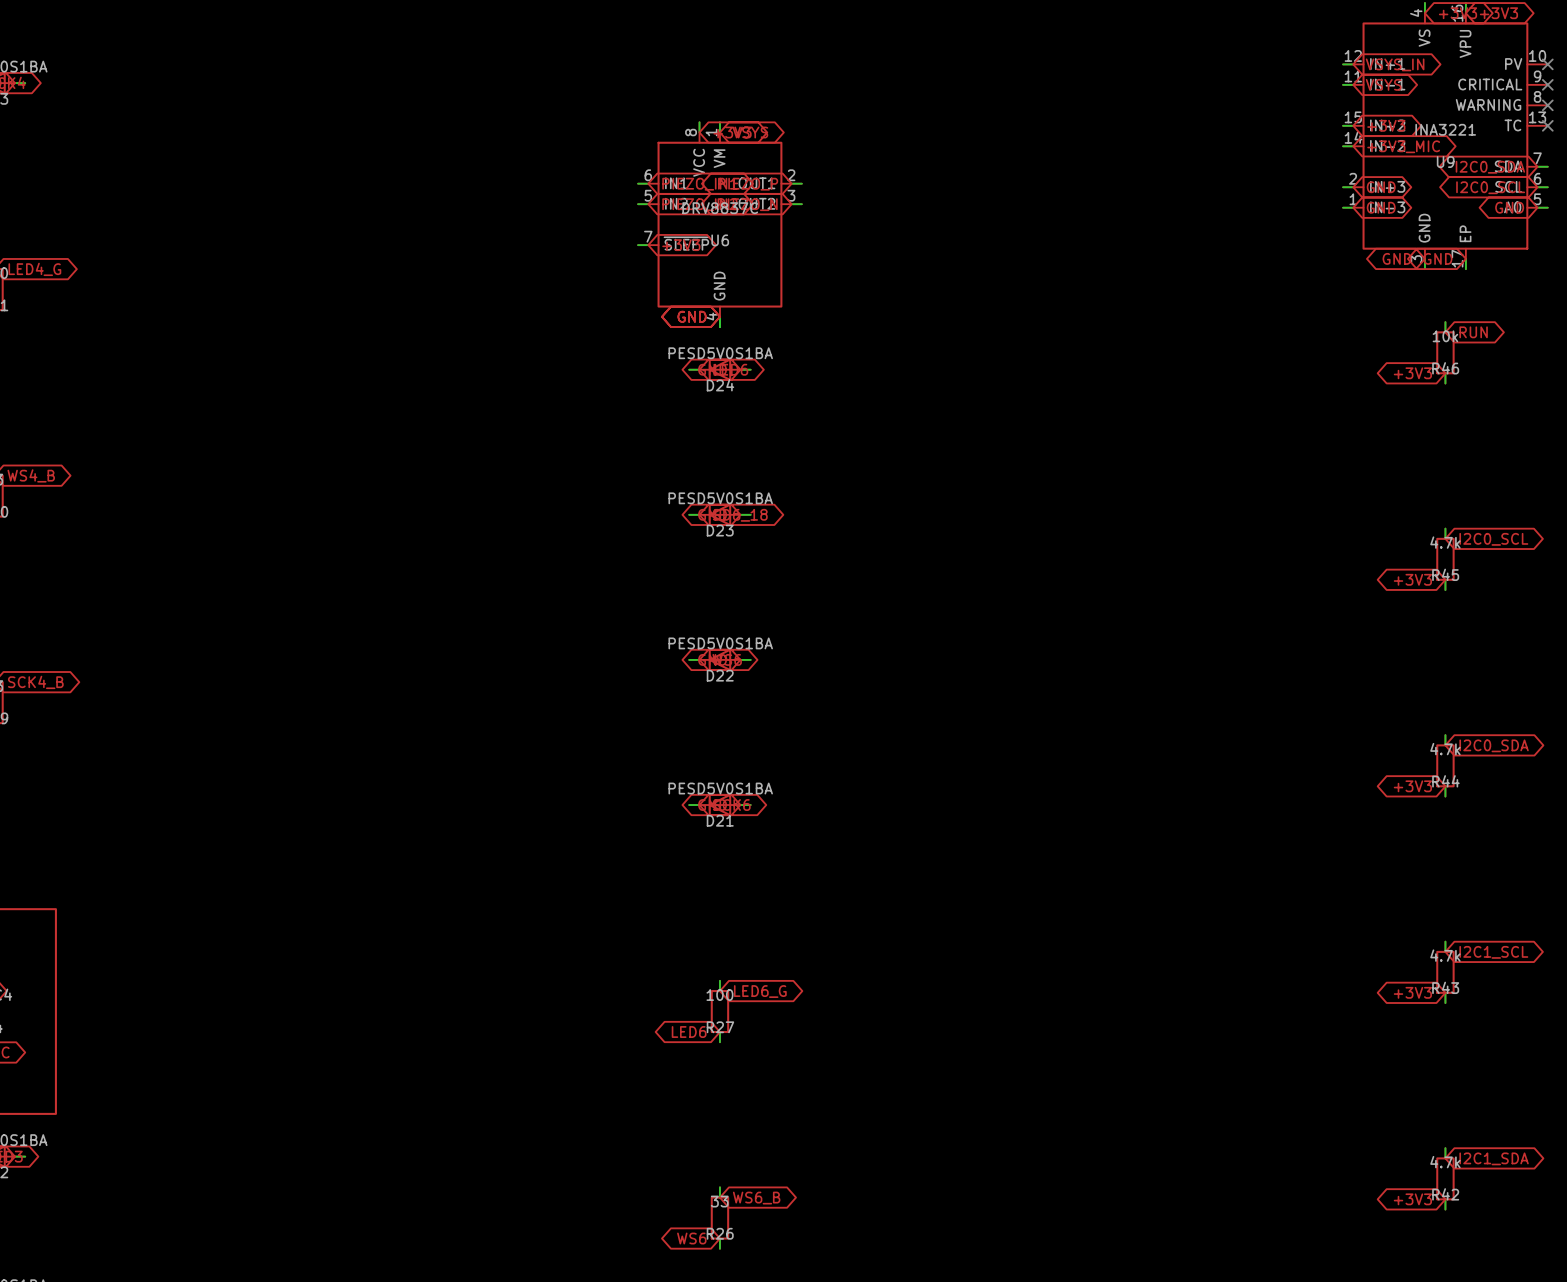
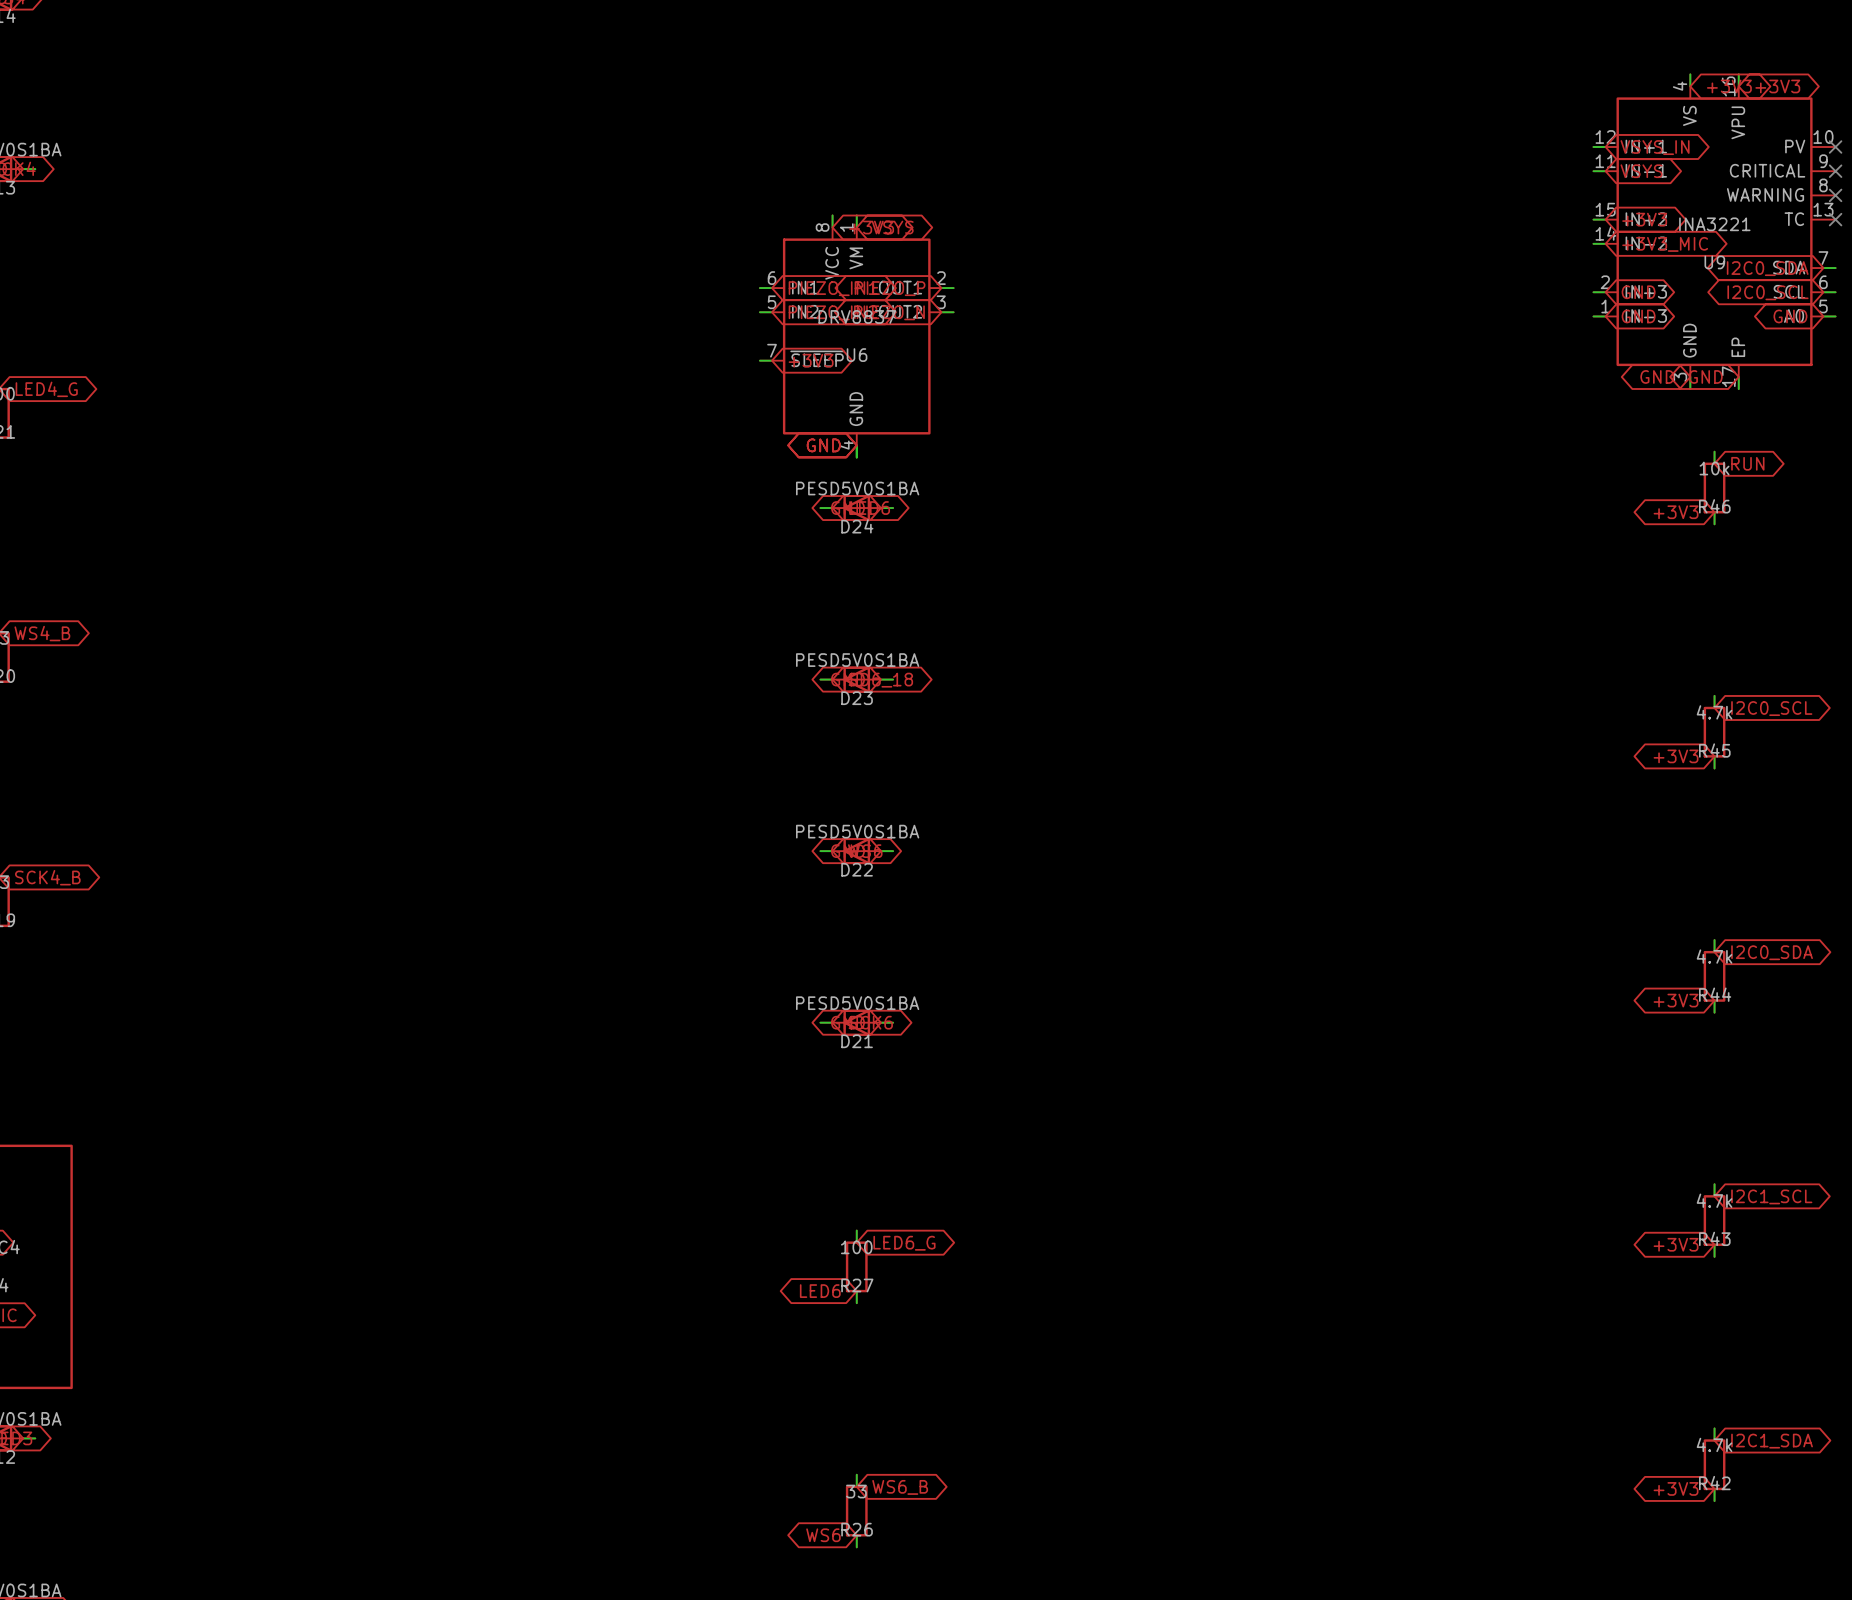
U6 value: DRV8837C (720, 208) -> DRV8837 (857, 316)

